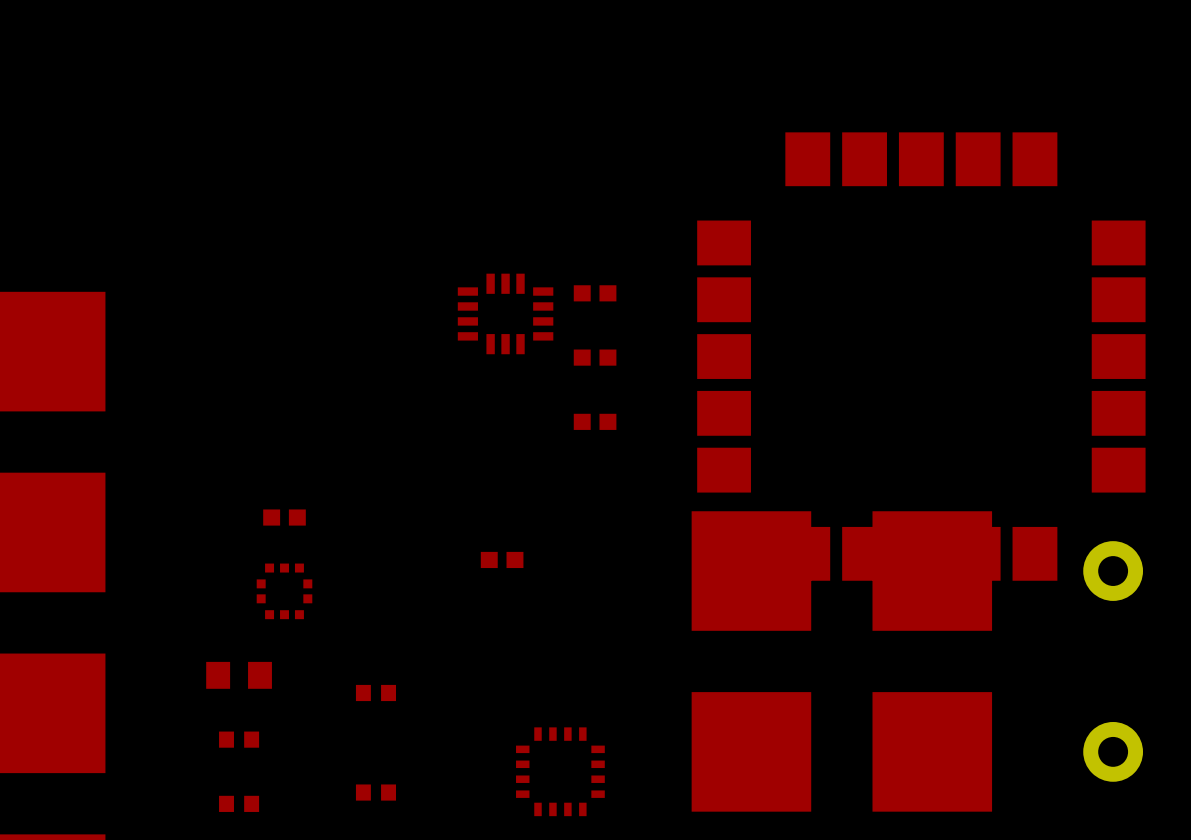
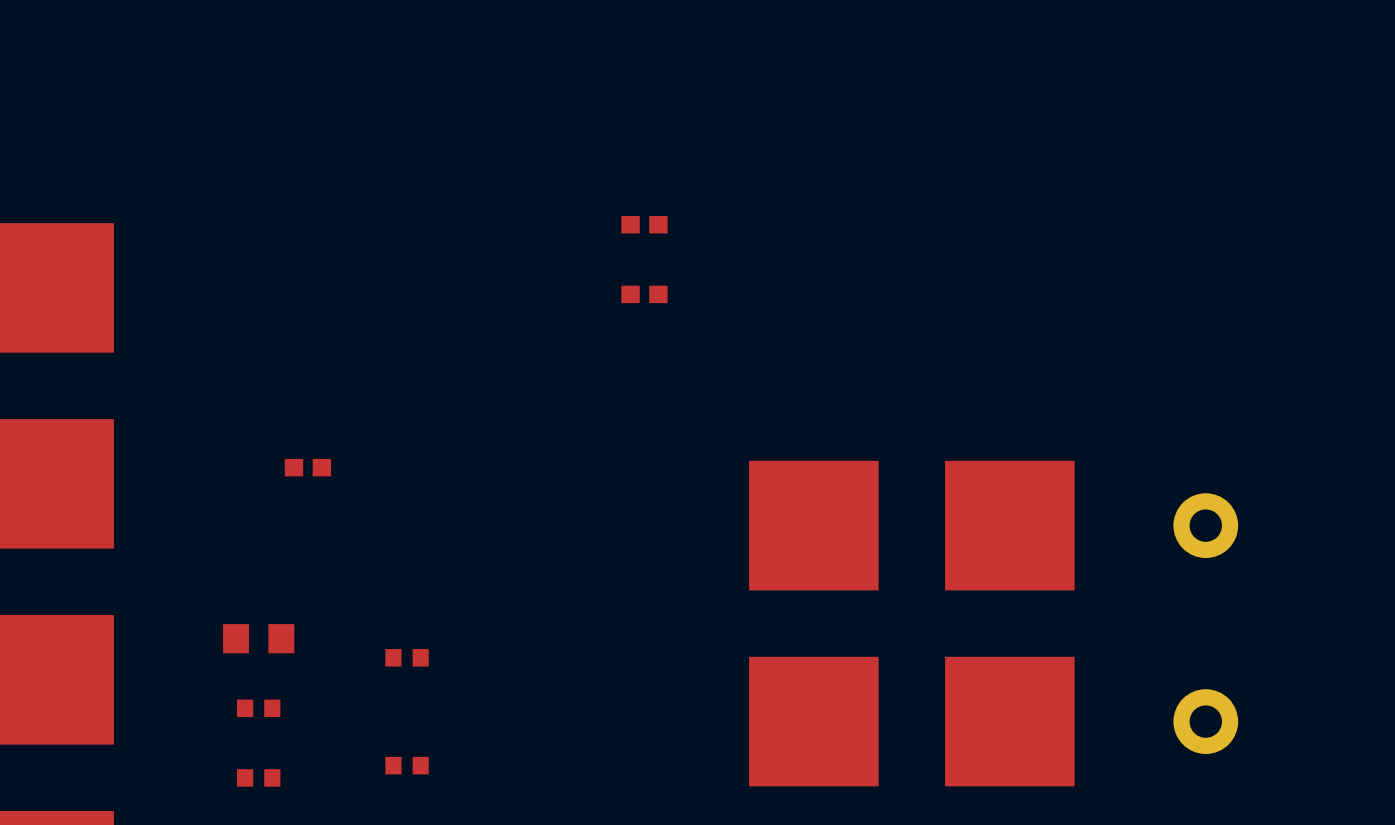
part: (505, 313) -> none
part: (921, 356) -> none
part: (595, 421) -> none
part: (502, 559) -> none
part: (284, 591) -> none
part: (560, 771) -> none

